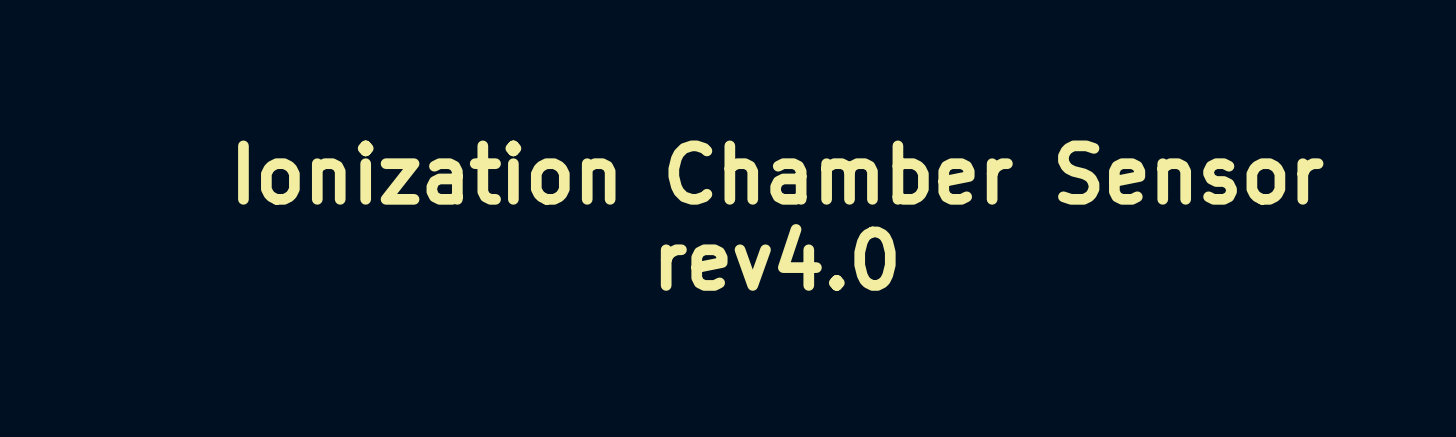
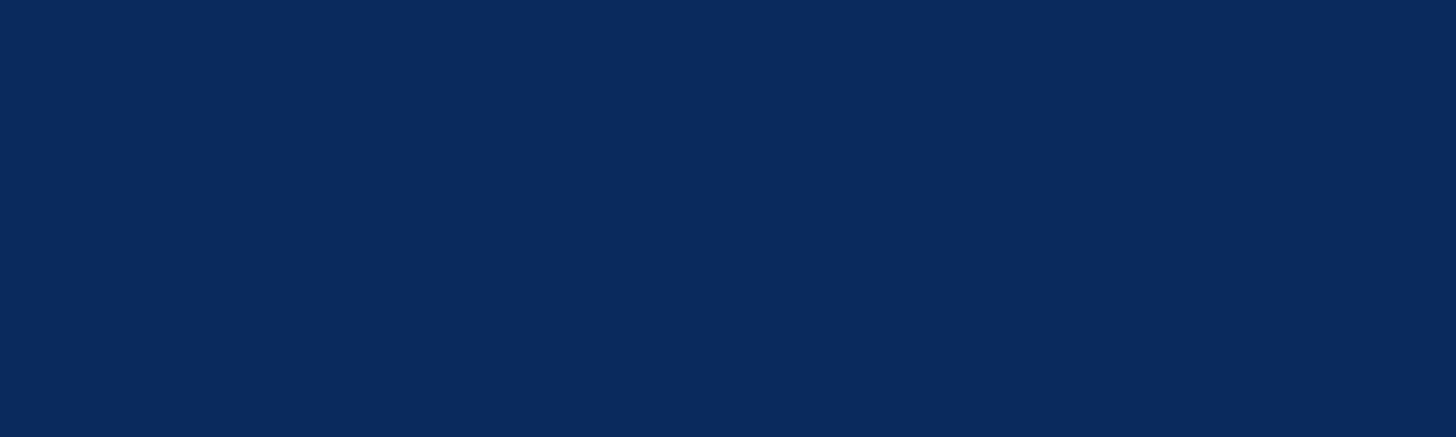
text: Ionization Chamber Sensor (780, 172) -> none
text: rev4.0 (778, 257) -> none

